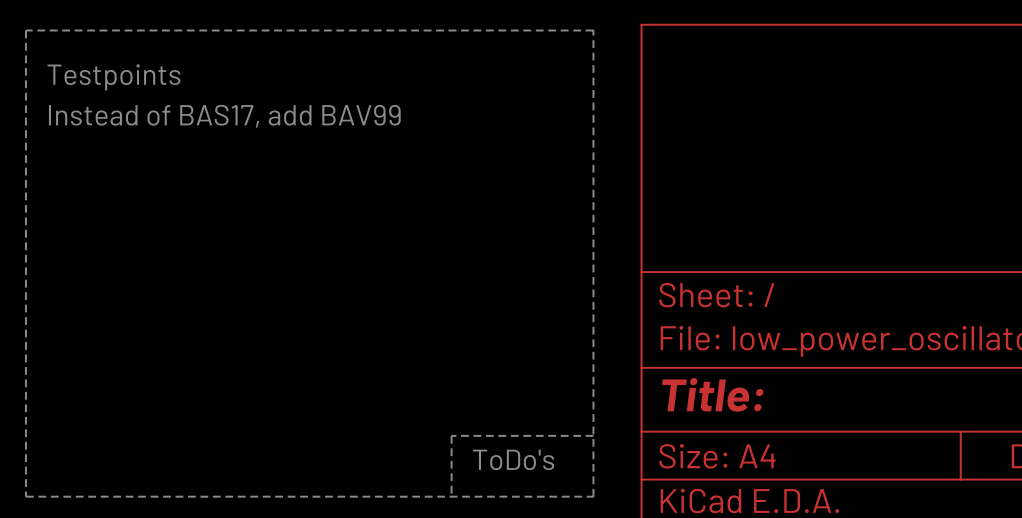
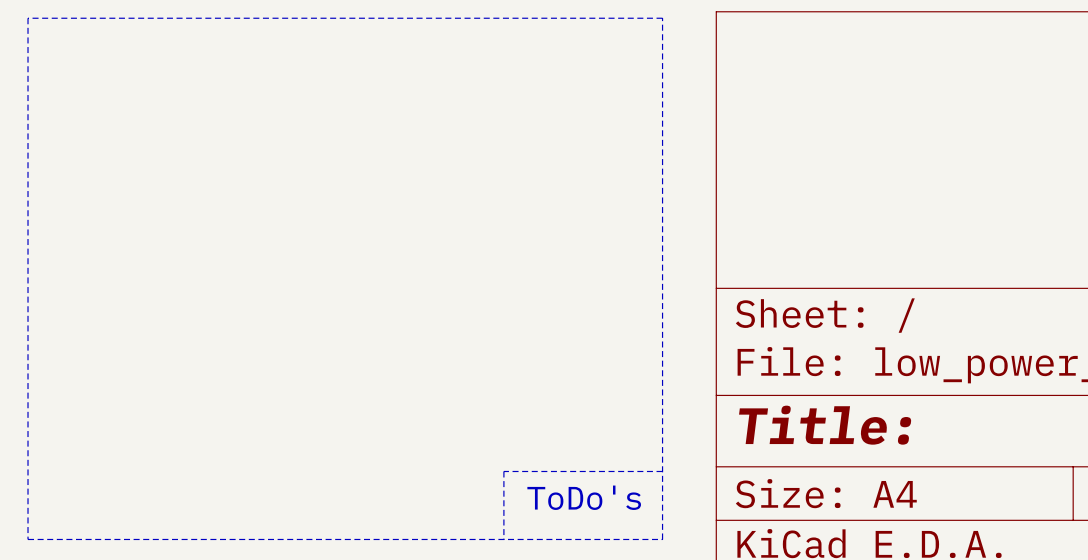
text: Testpoints (113, 77) -> none
text: Instead of BAS17, add BAV99 (224, 116) -> none

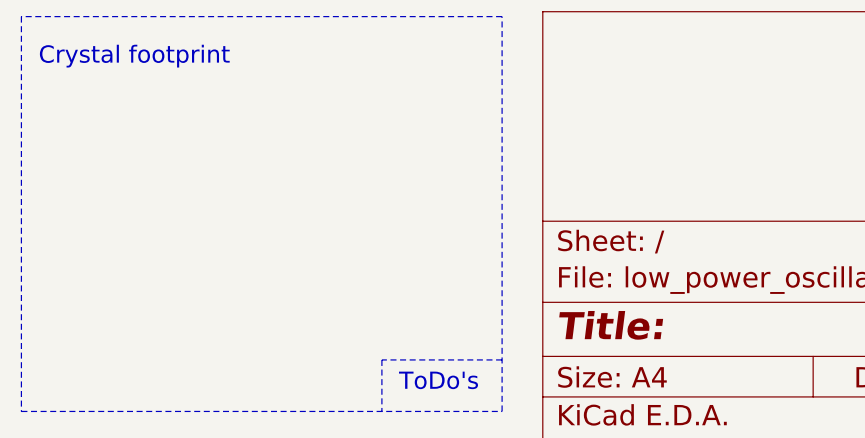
text: none -> Crystal footprint (134, 56)

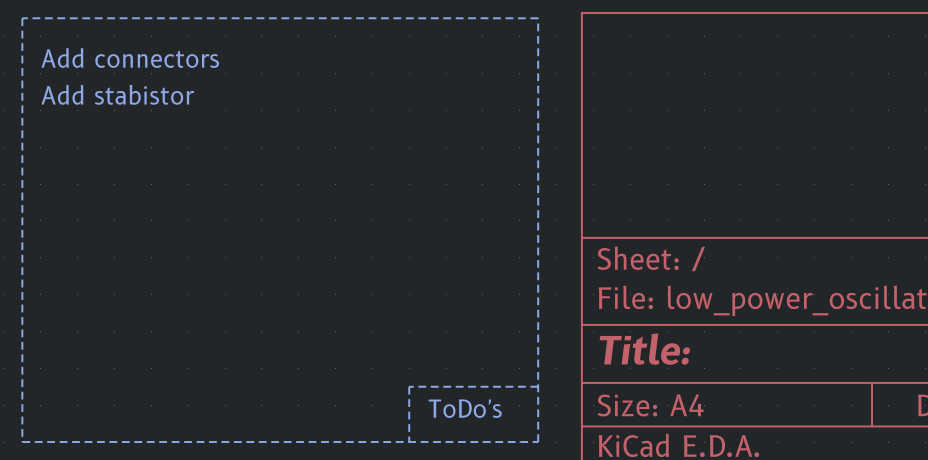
text: Crystal footprint (134, 56) -> Add connectors (130, 57)
text: none -> Add stabistor (117, 94)

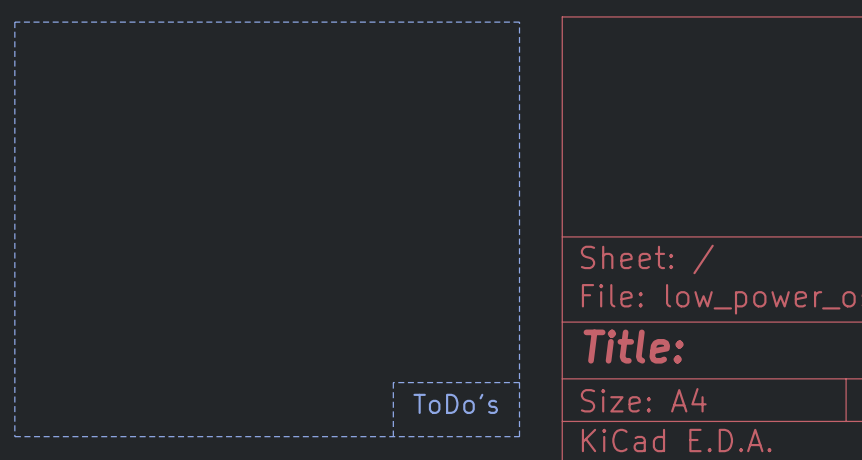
text: Add connectors (130, 57) -> none
text: Add stabistor (117, 94) -> none

